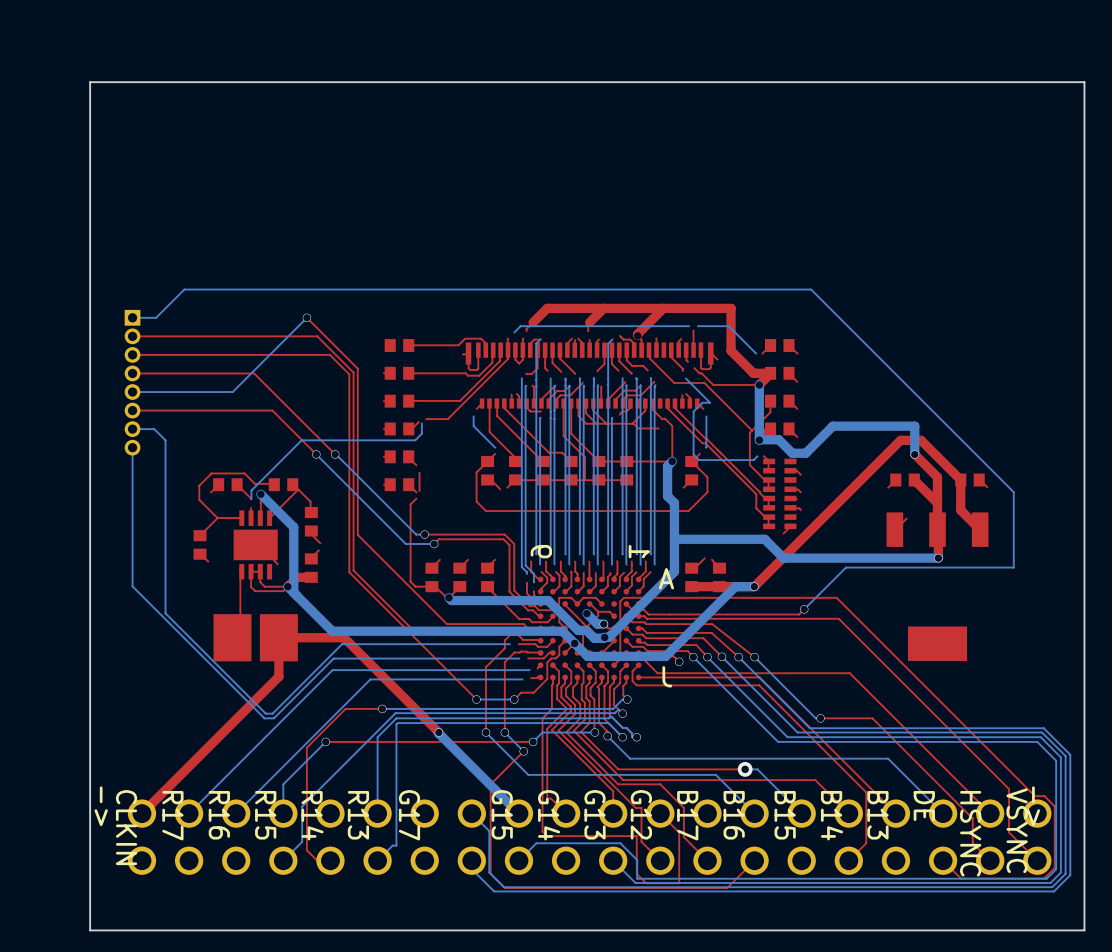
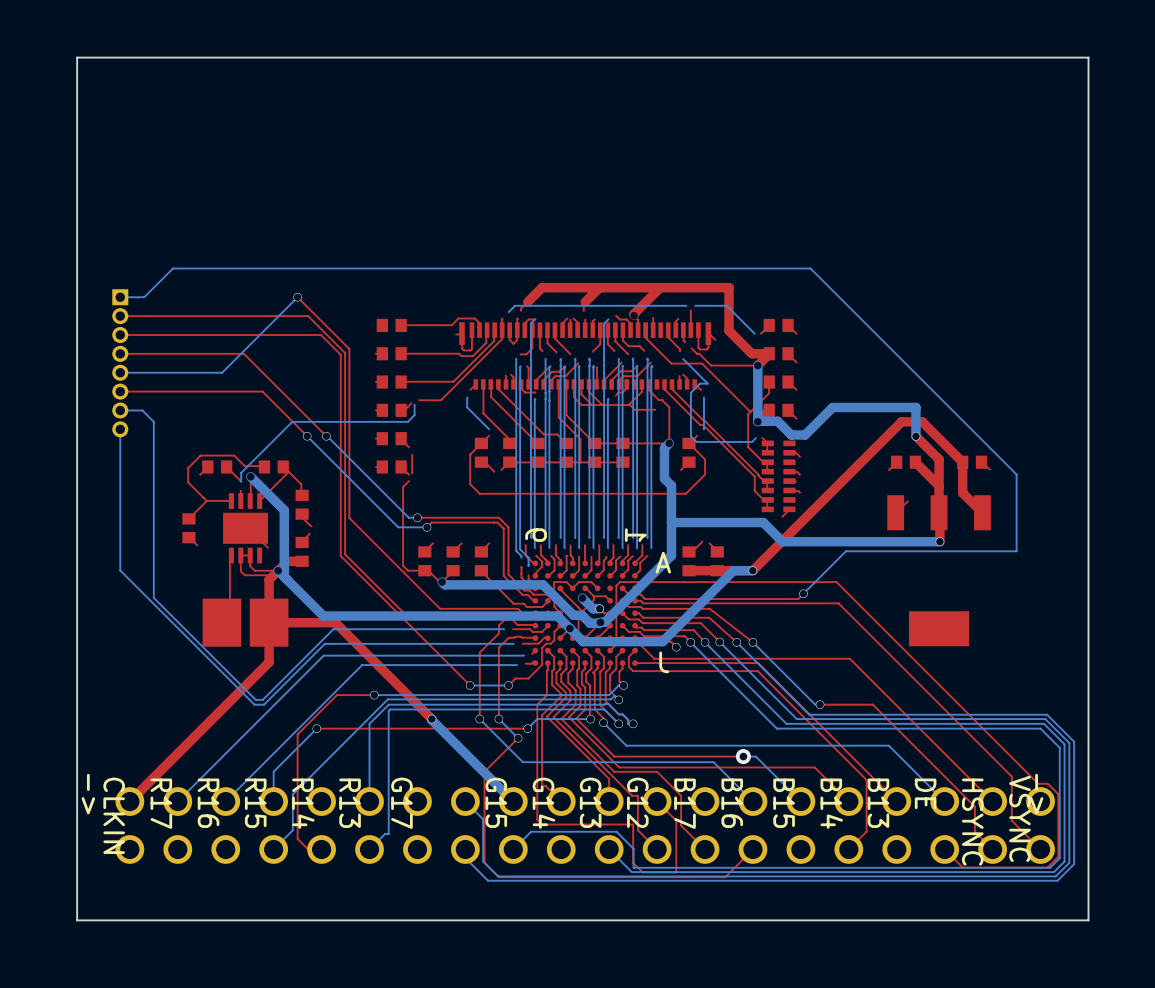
top track: none -> (278, 570) (269, 579) (269, 622)
top track: none -> (600, 622) (585, 638)

